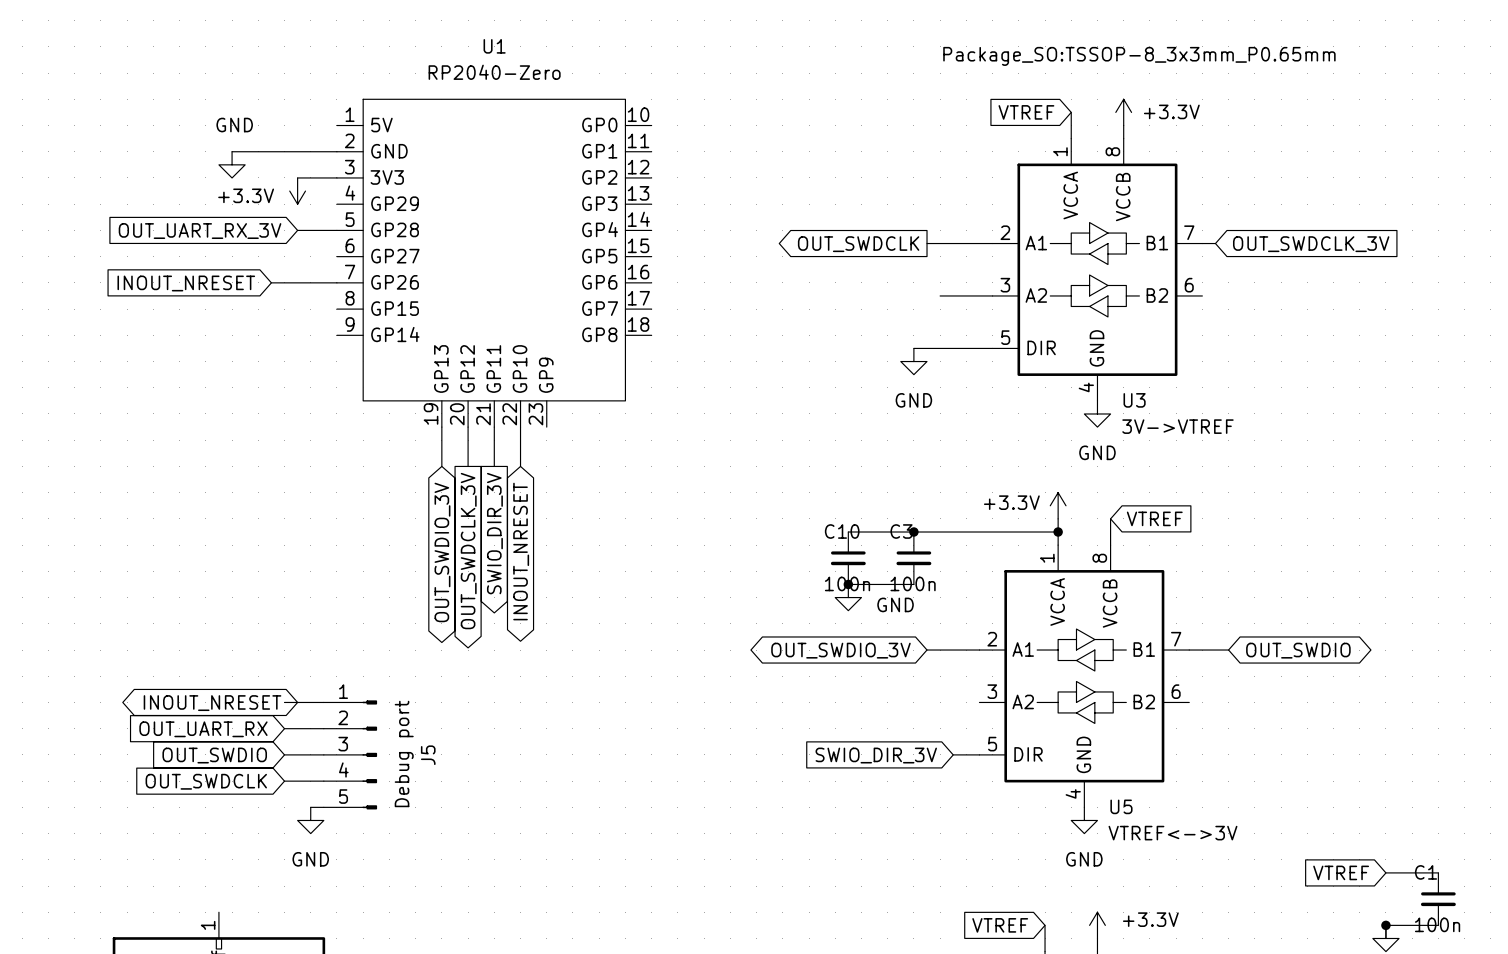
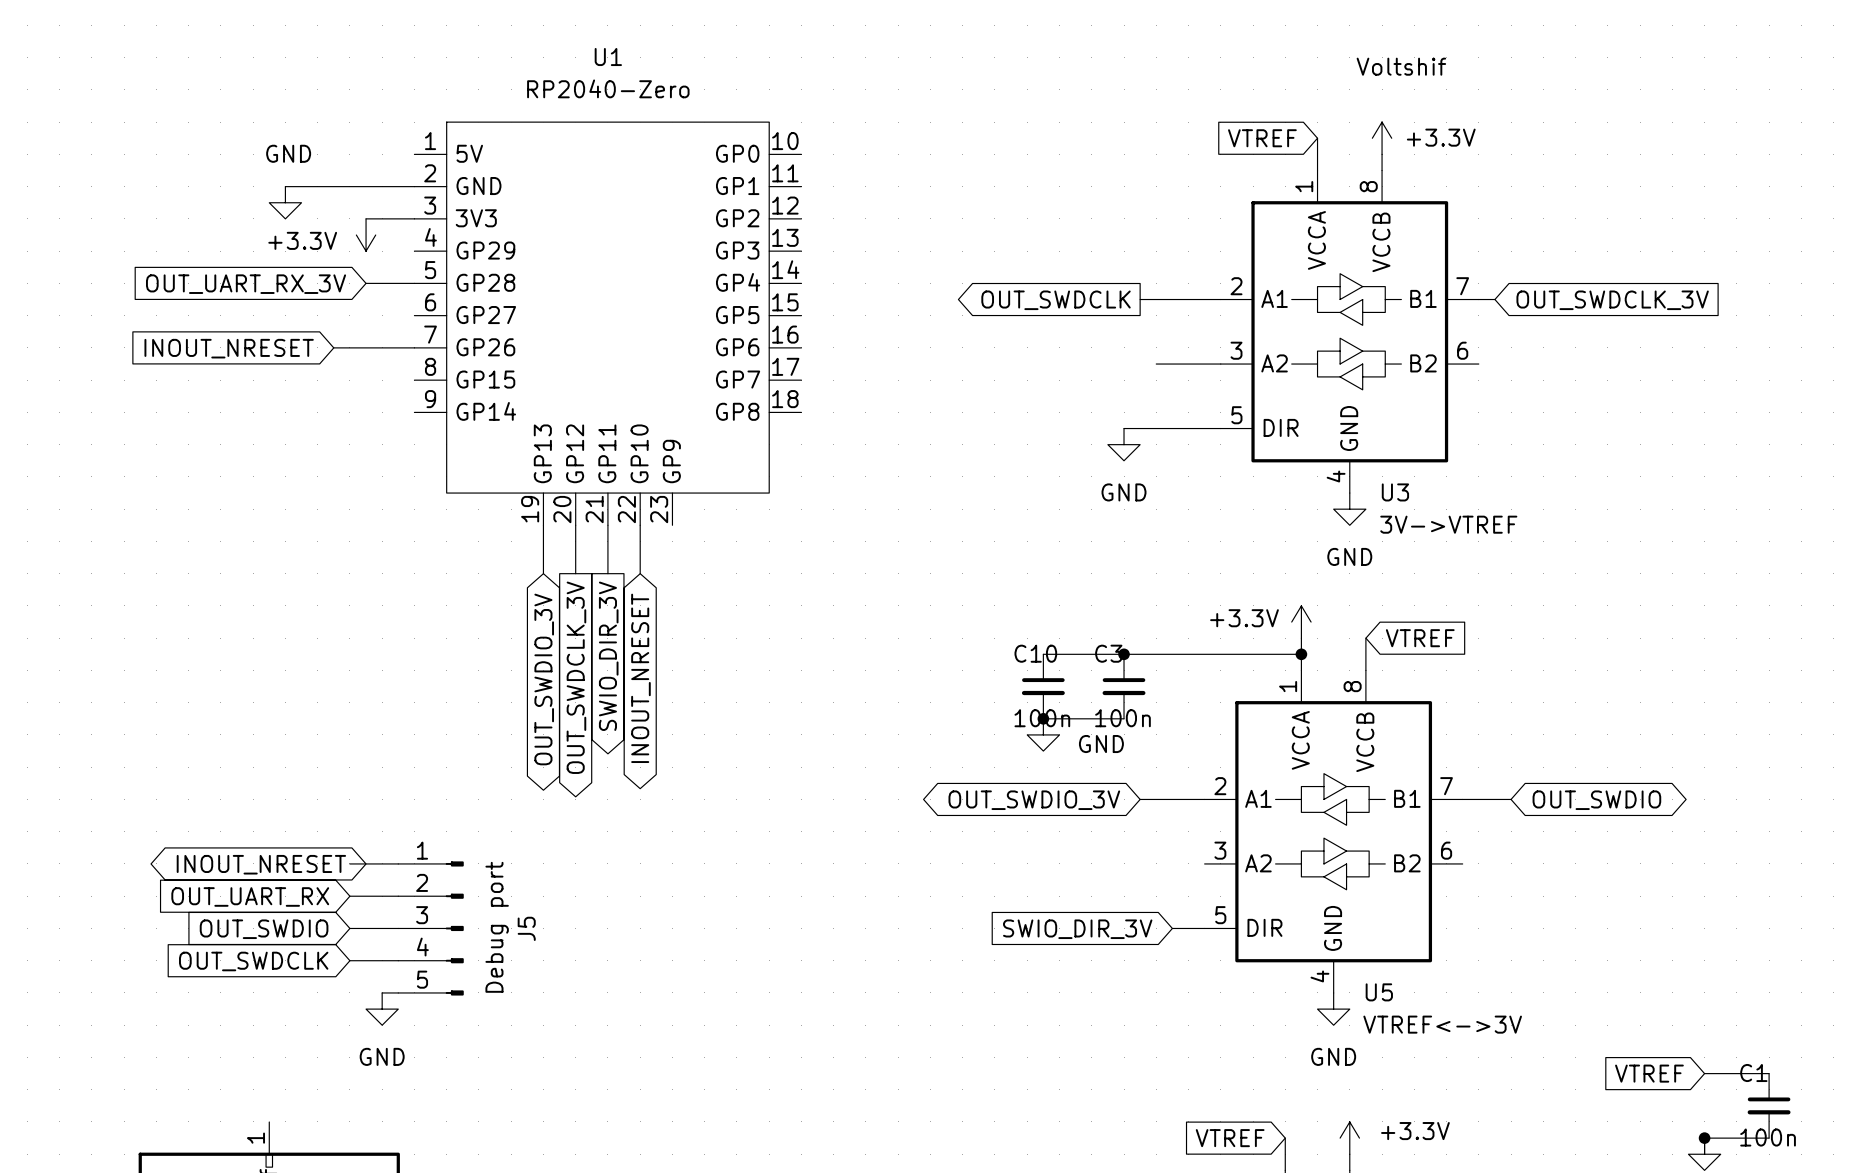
U3 text: Package_SO:TSSOP-8_3x3mm_P0.65mm (1139, 56) -> Voltshif (1401, 66)

